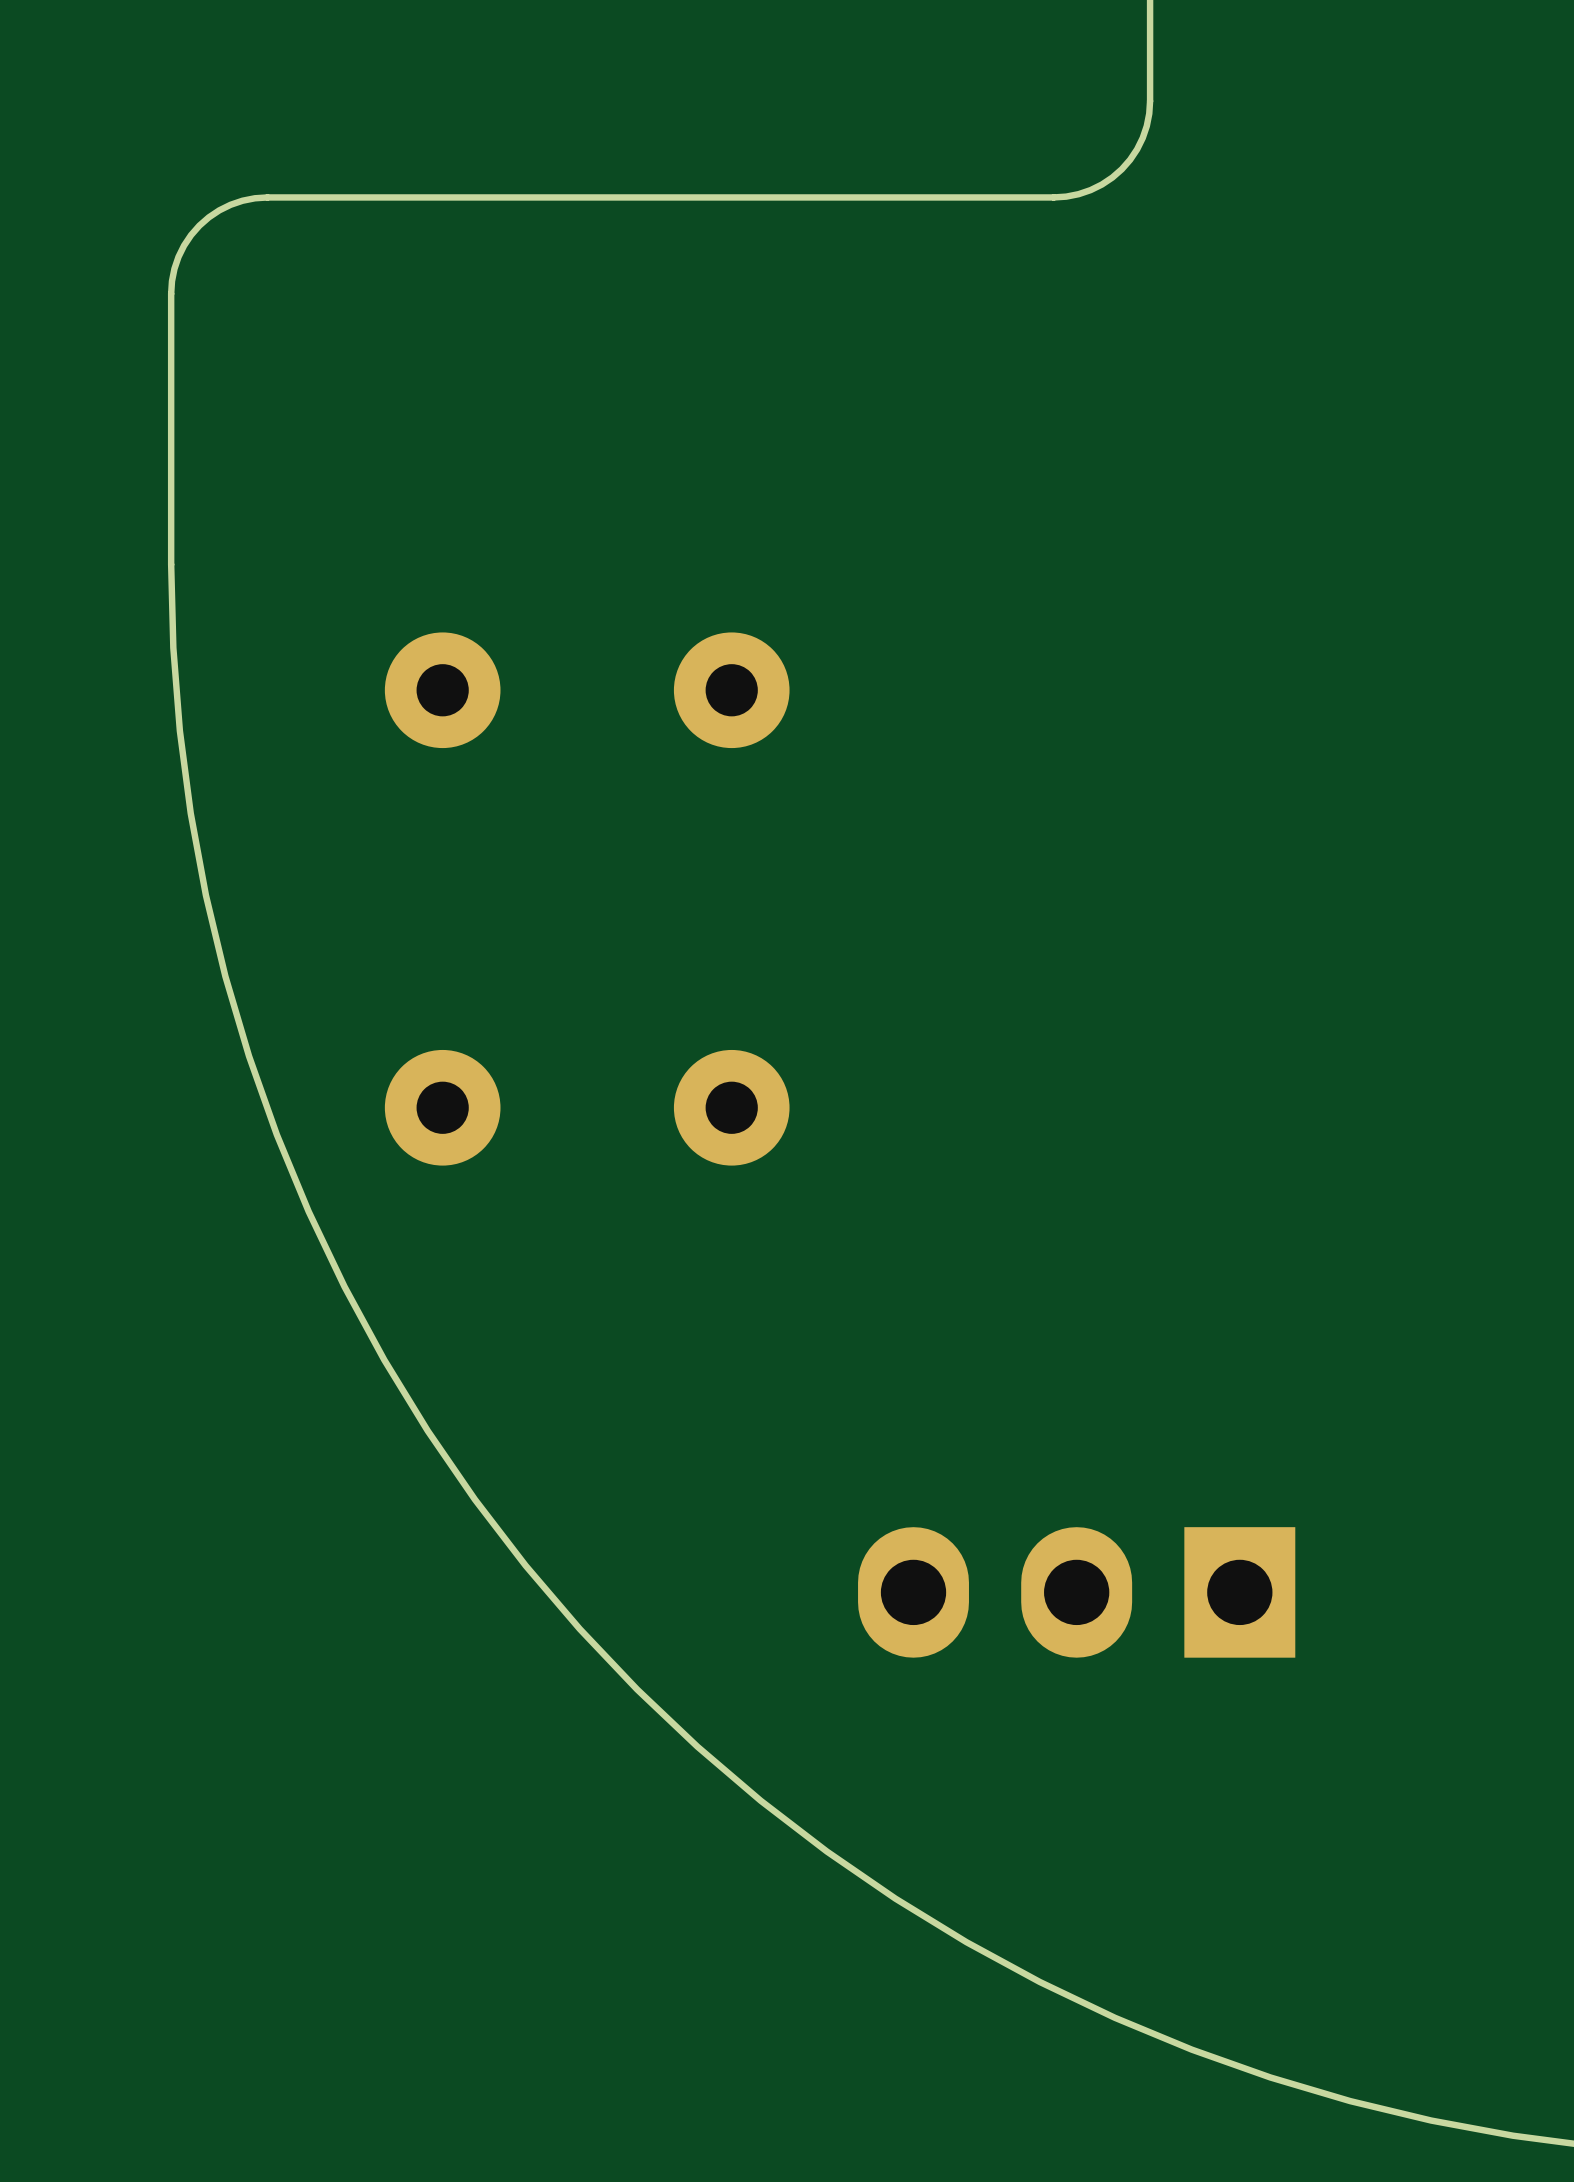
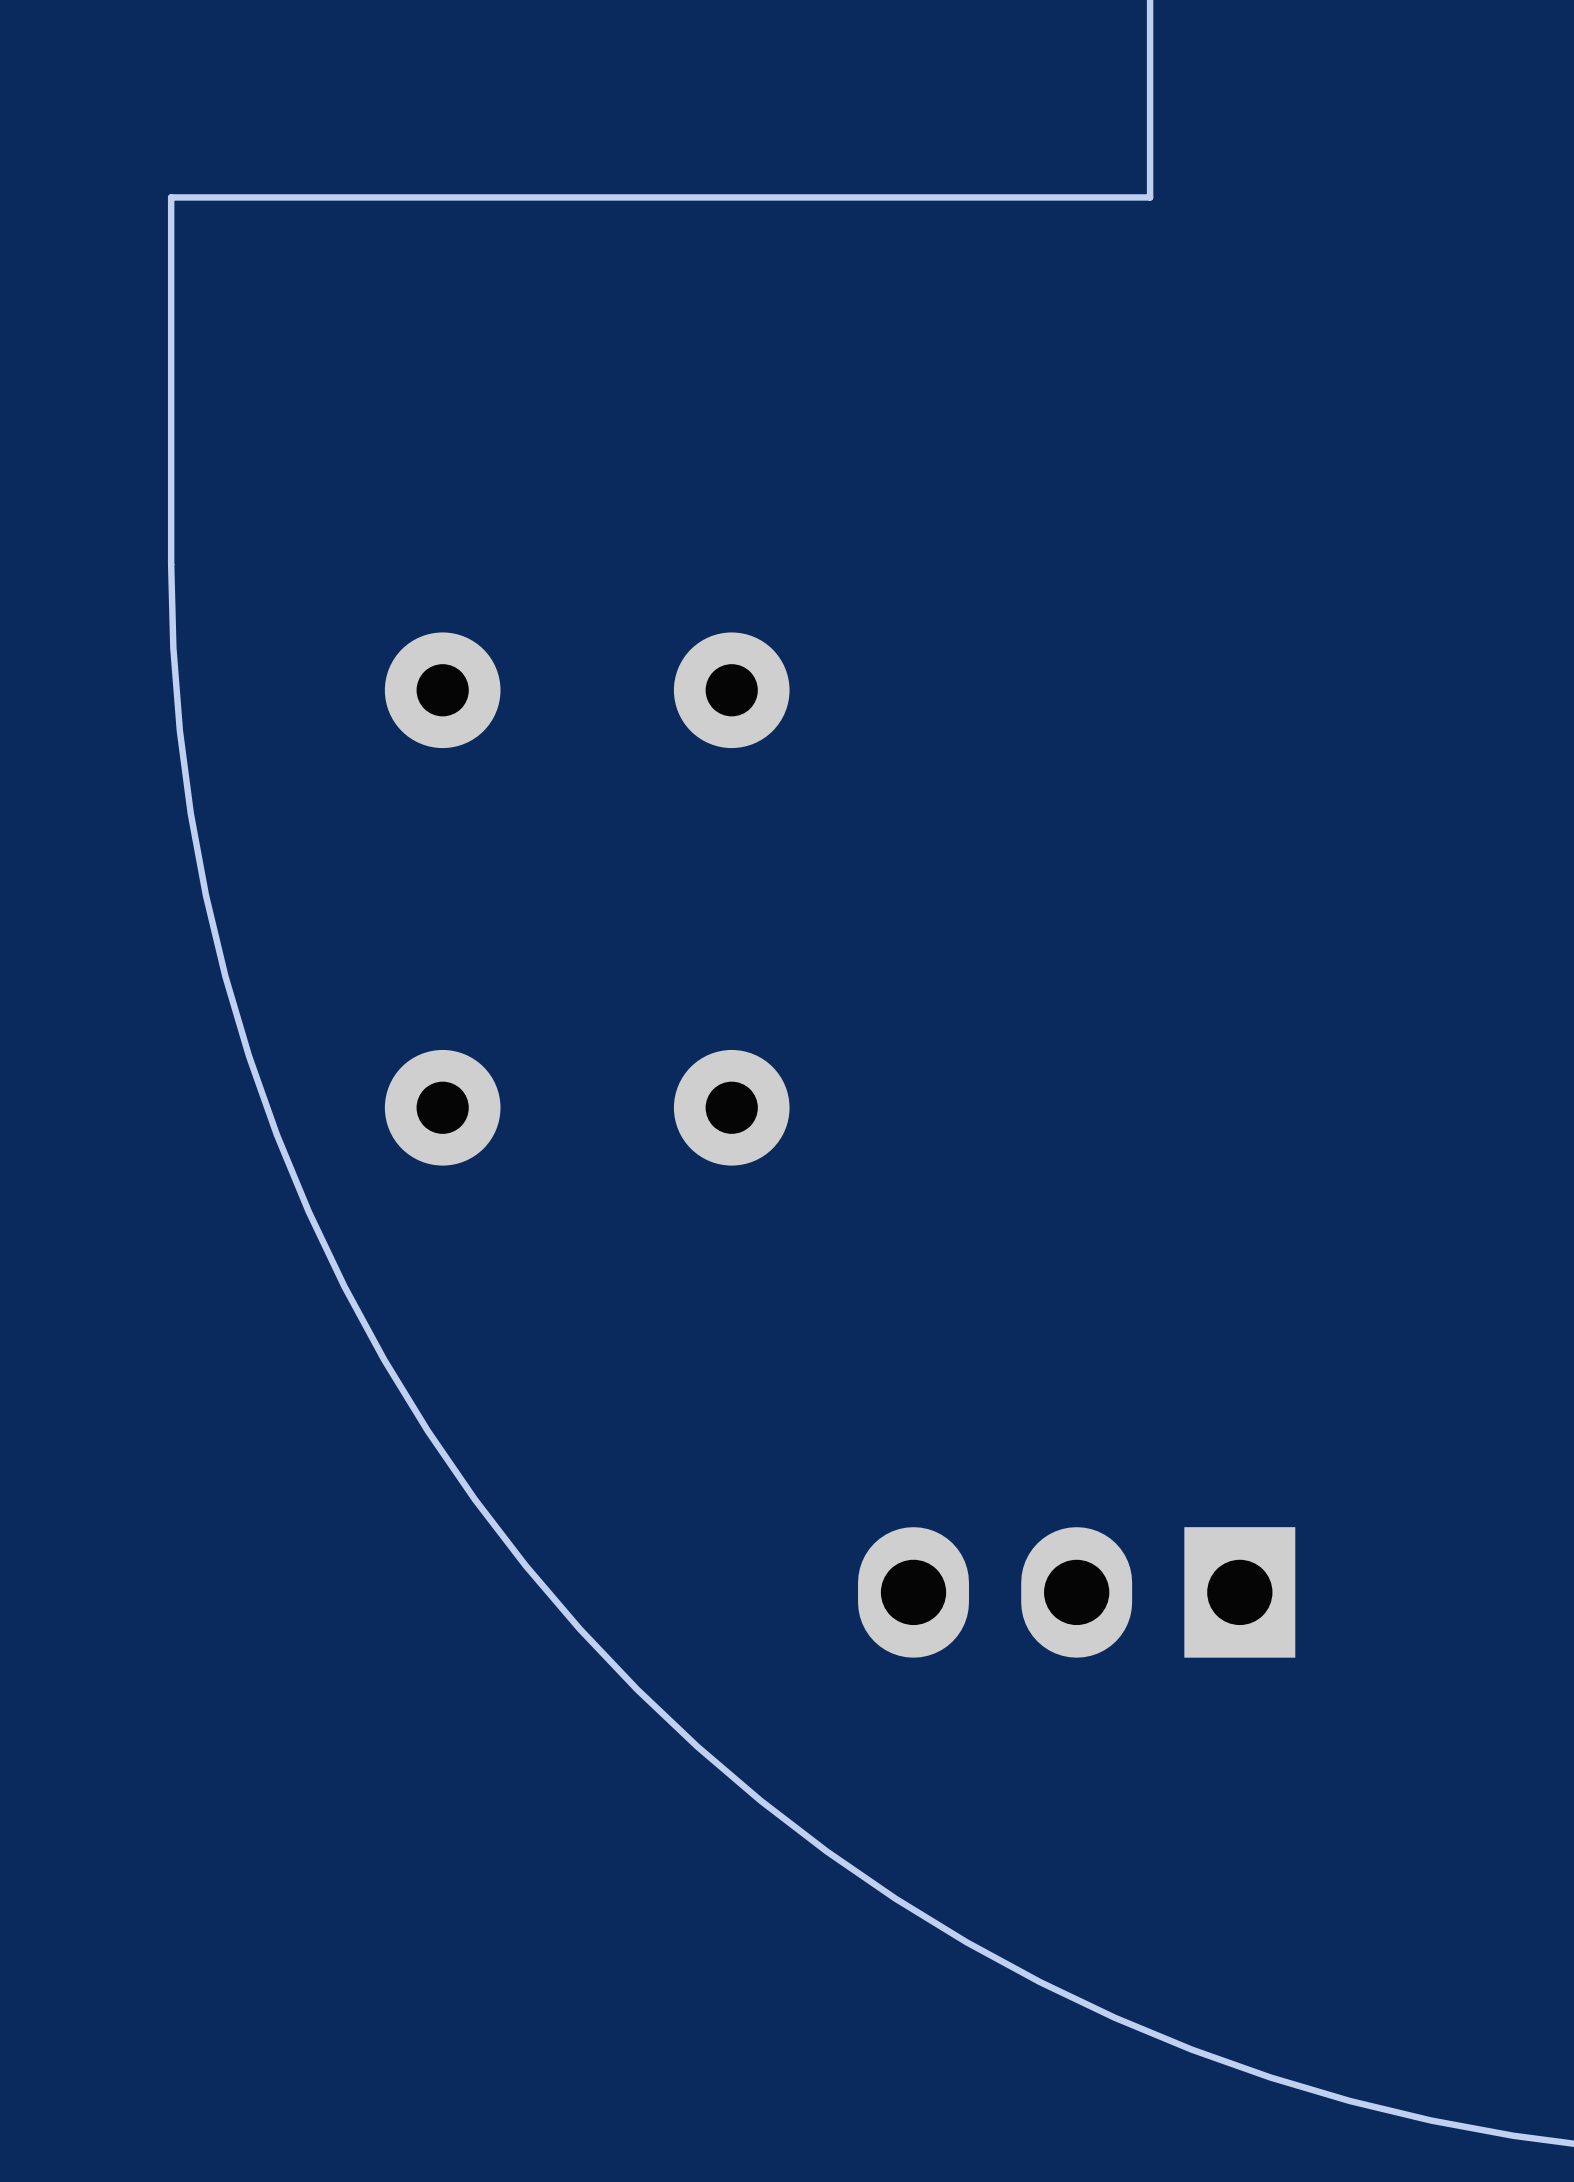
board edge: (1150, 101) (1146, 126) (1142, 137) (1130, 159) (1121, 169) (1112, 177) (1090, 190) (1066, 196) (1053, 197) -> (1150, 101) (1150, 197) (1053, 197)
board edge: (267, 197) (254, 198) (230, 204) (208, 217) (199, 225) (191, 235) (178, 256) (174, 268) (171, 293) -> (267, 197) (171, 197) (171, 293)

